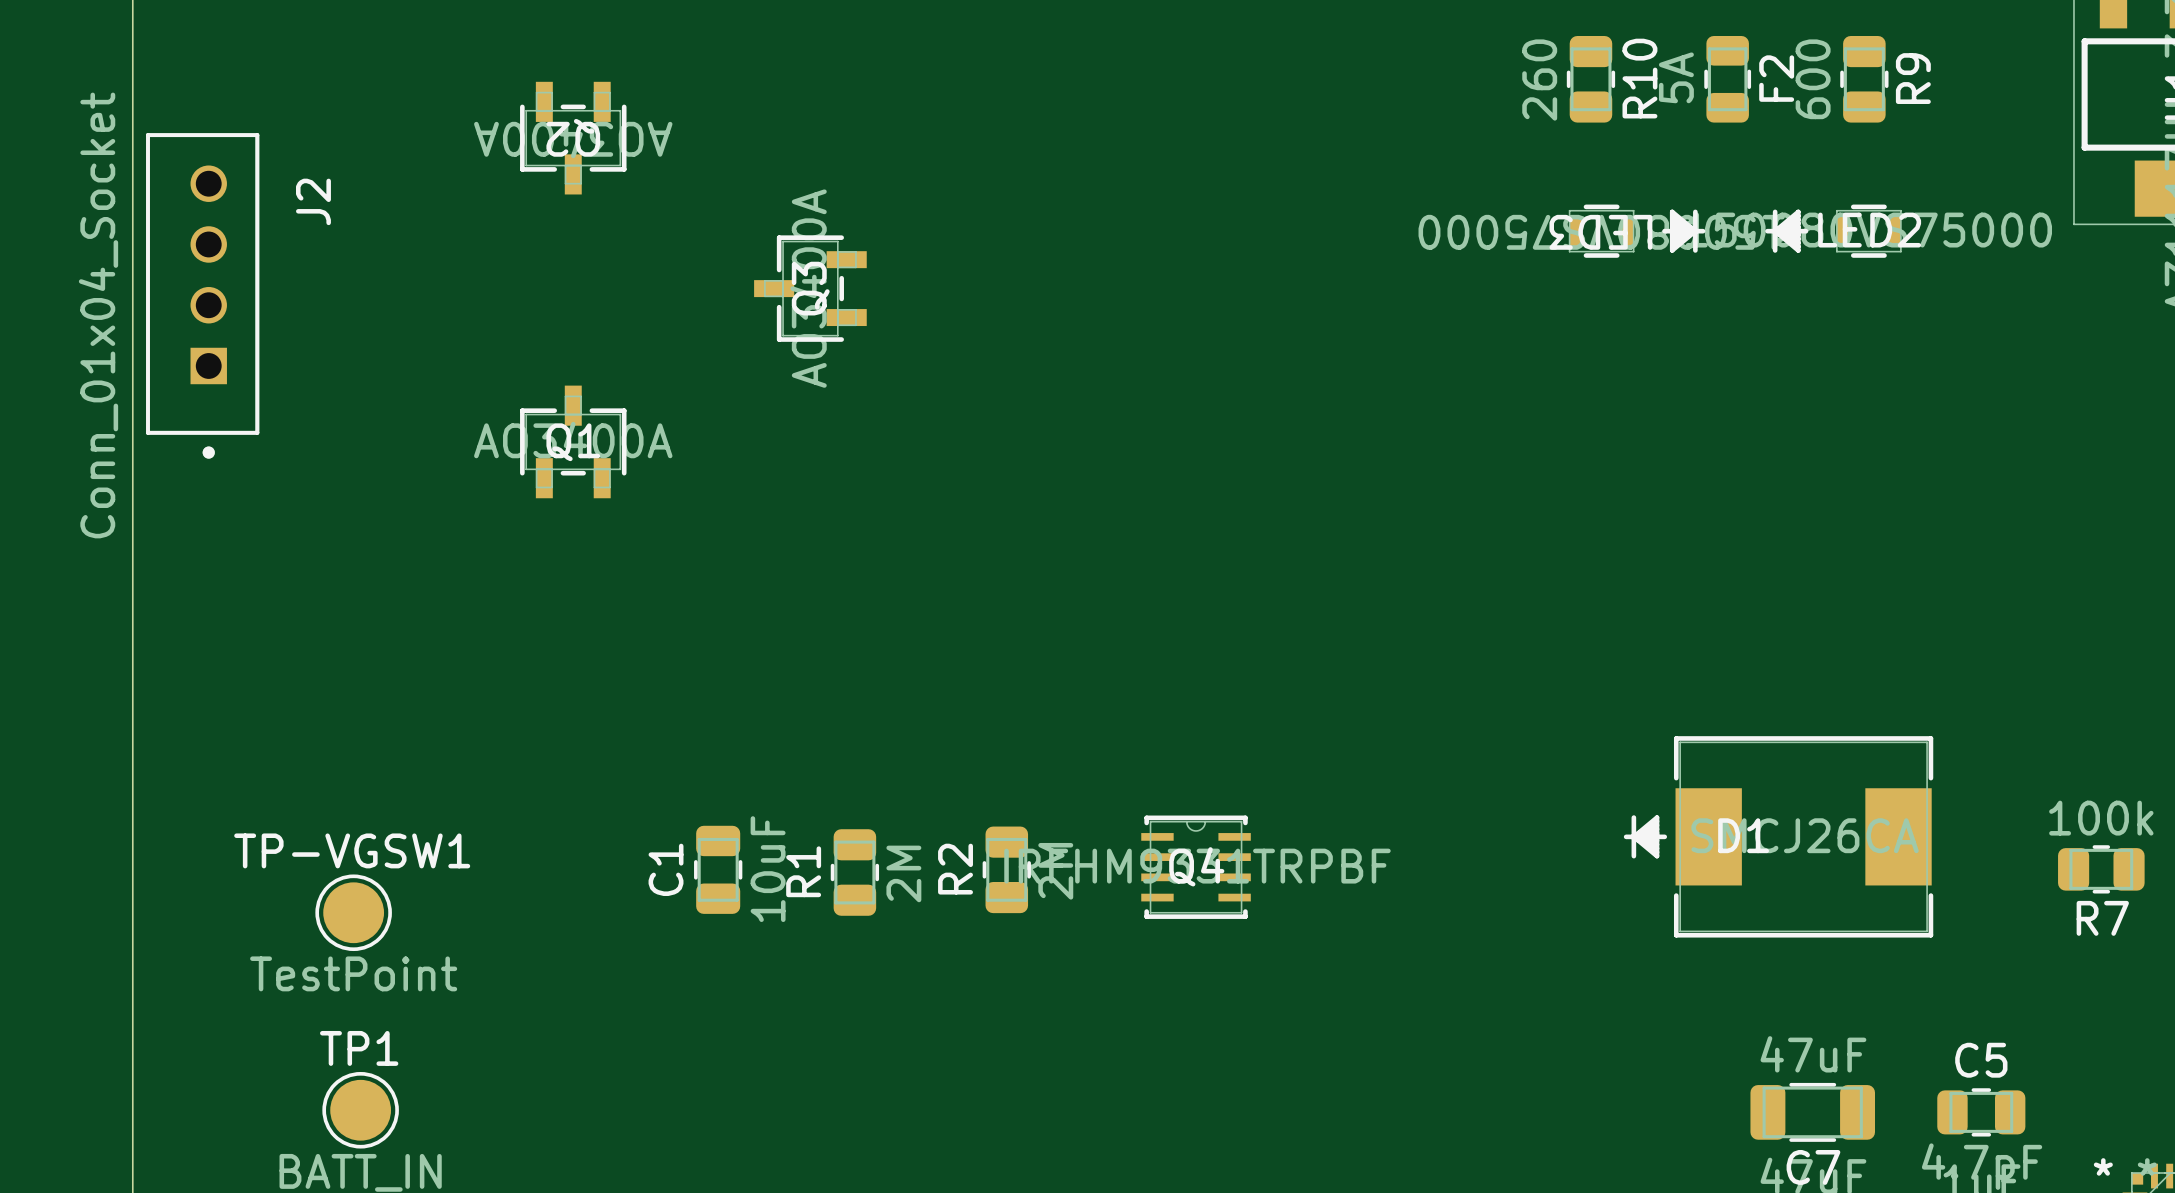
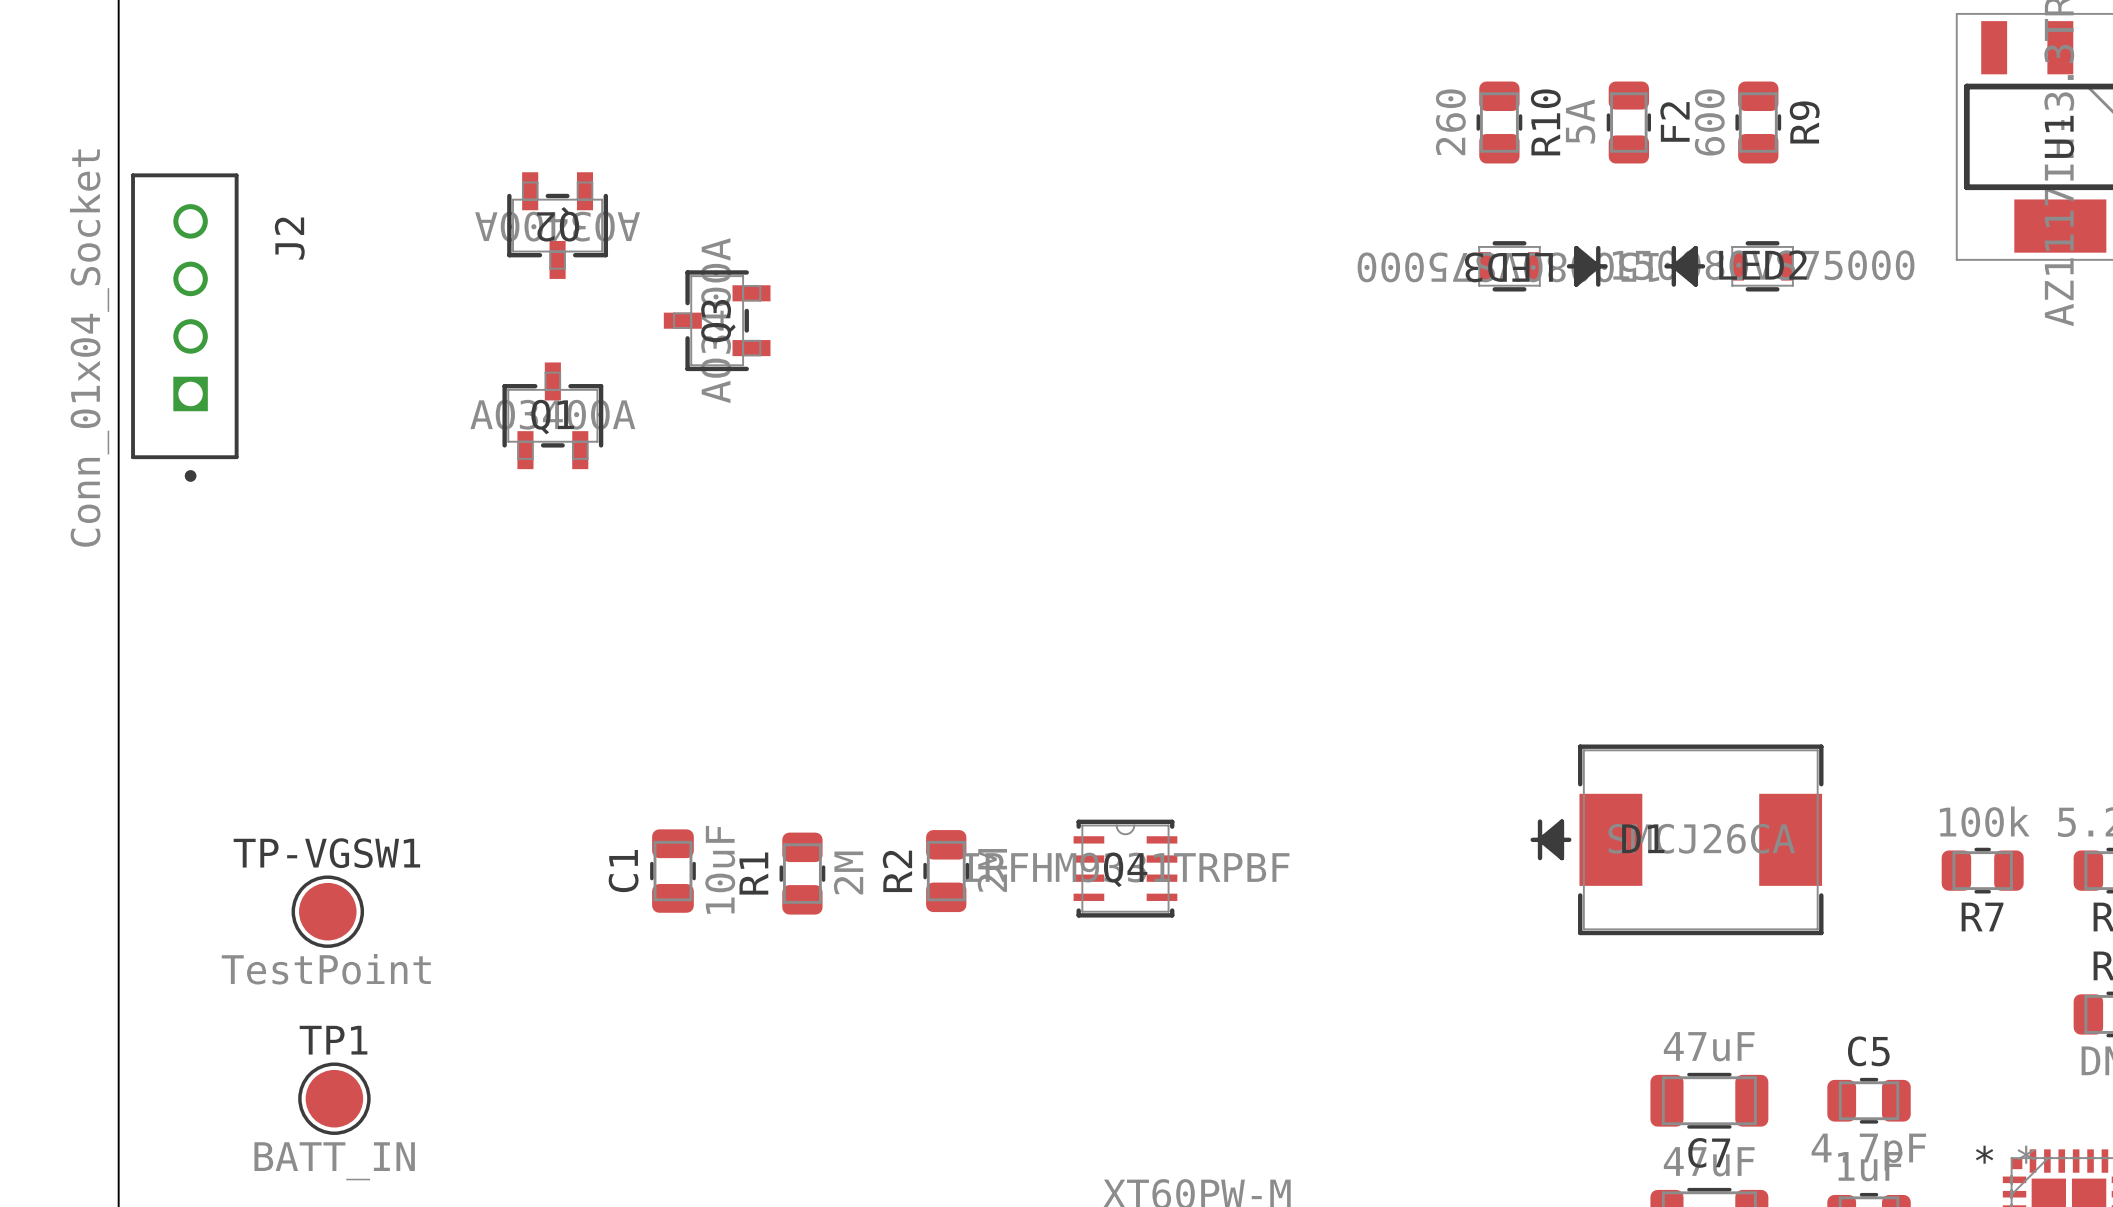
Q2 position: (573, 138) -> (557, 225)
Q3 position: (810, 288) -> (717, 320)
Q1 position: (573, 441) -> (552, 415)

